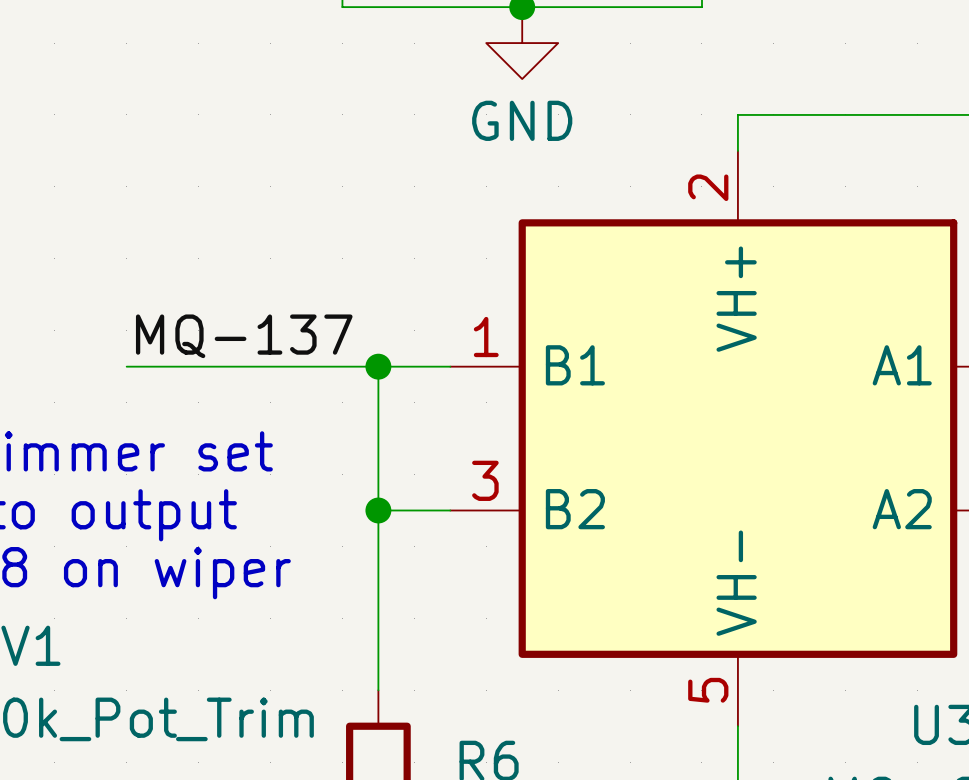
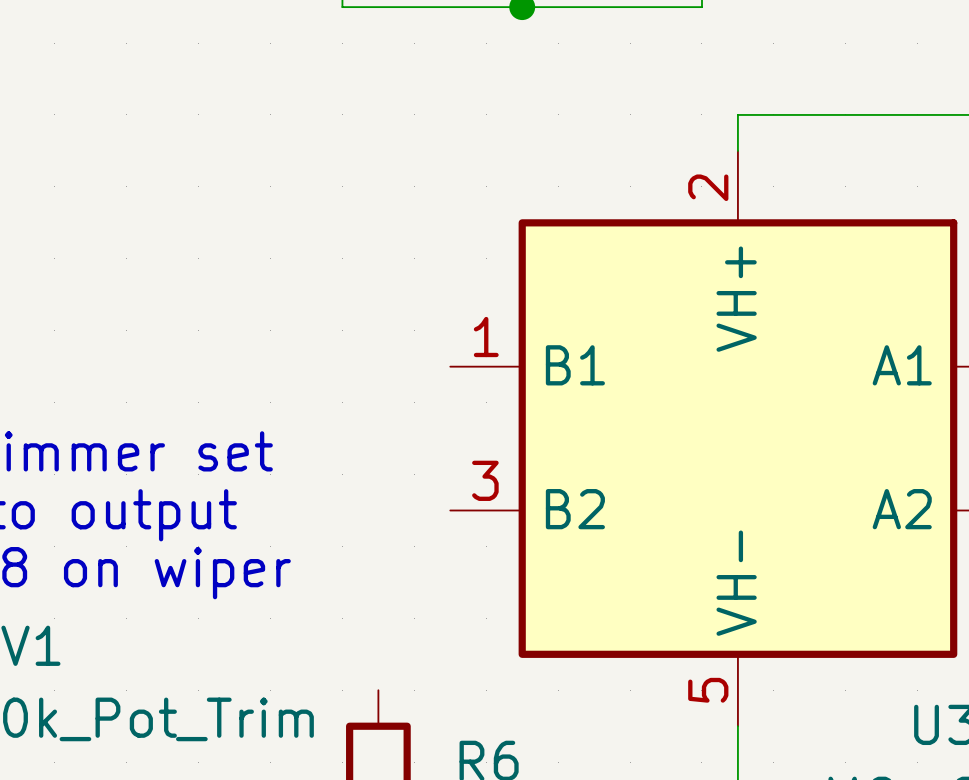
power symbol: GND (522, 43) -> none
label: MQ-137 (244, 336) -> none
wire: (126, 366) (450, 366) -> none
wire: (378, 366) (378, 690) -> none
junction: (378, 366) -> none
wire: (378, 510) (450, 510) -> none
junction: (378, 510) -> none

